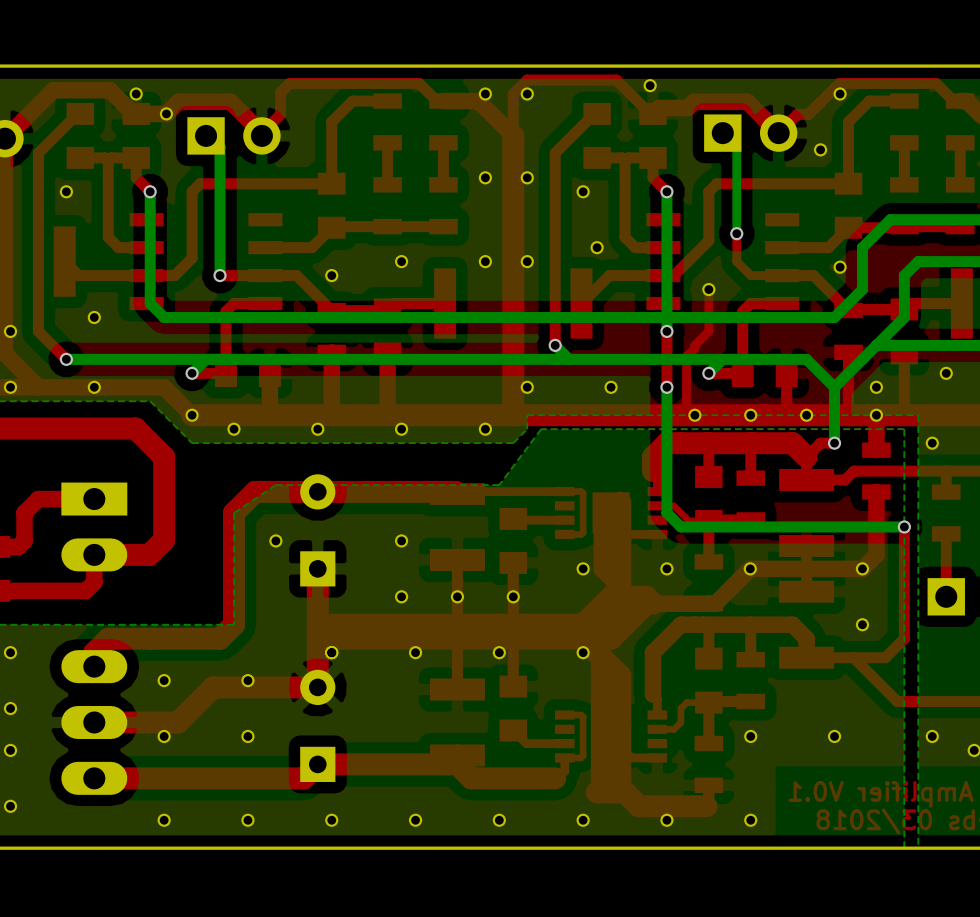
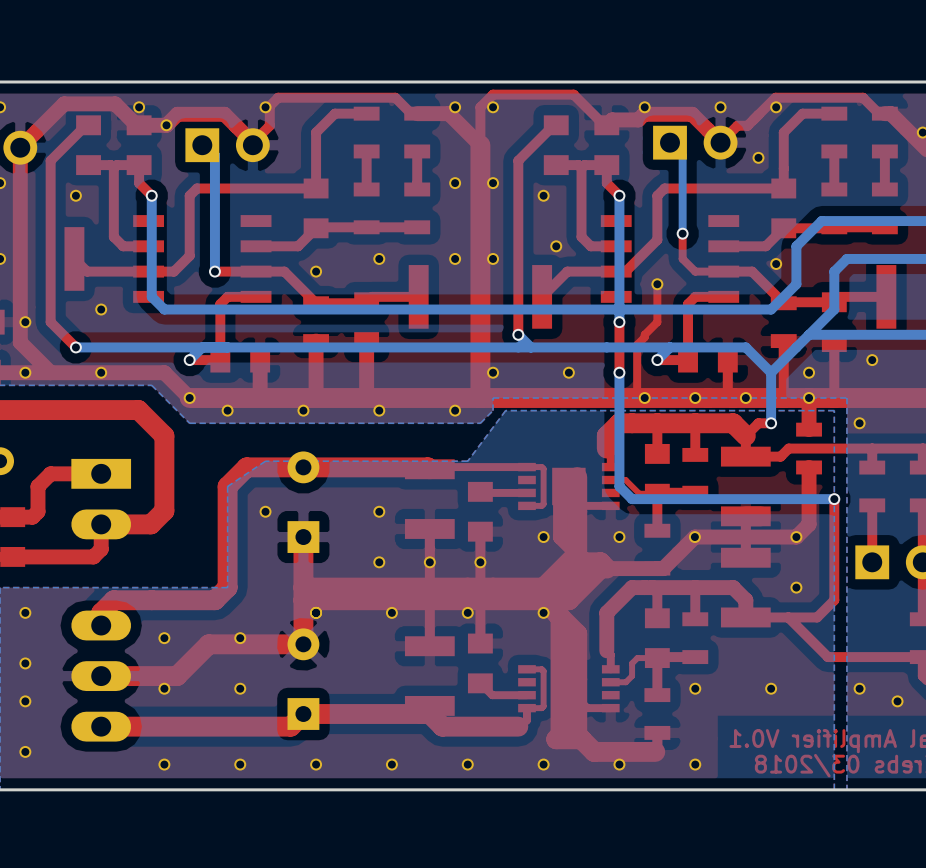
part position: (650, 85) -> (644, 107)
part: none -> (265, 107)
part: none -> (720, 107)

